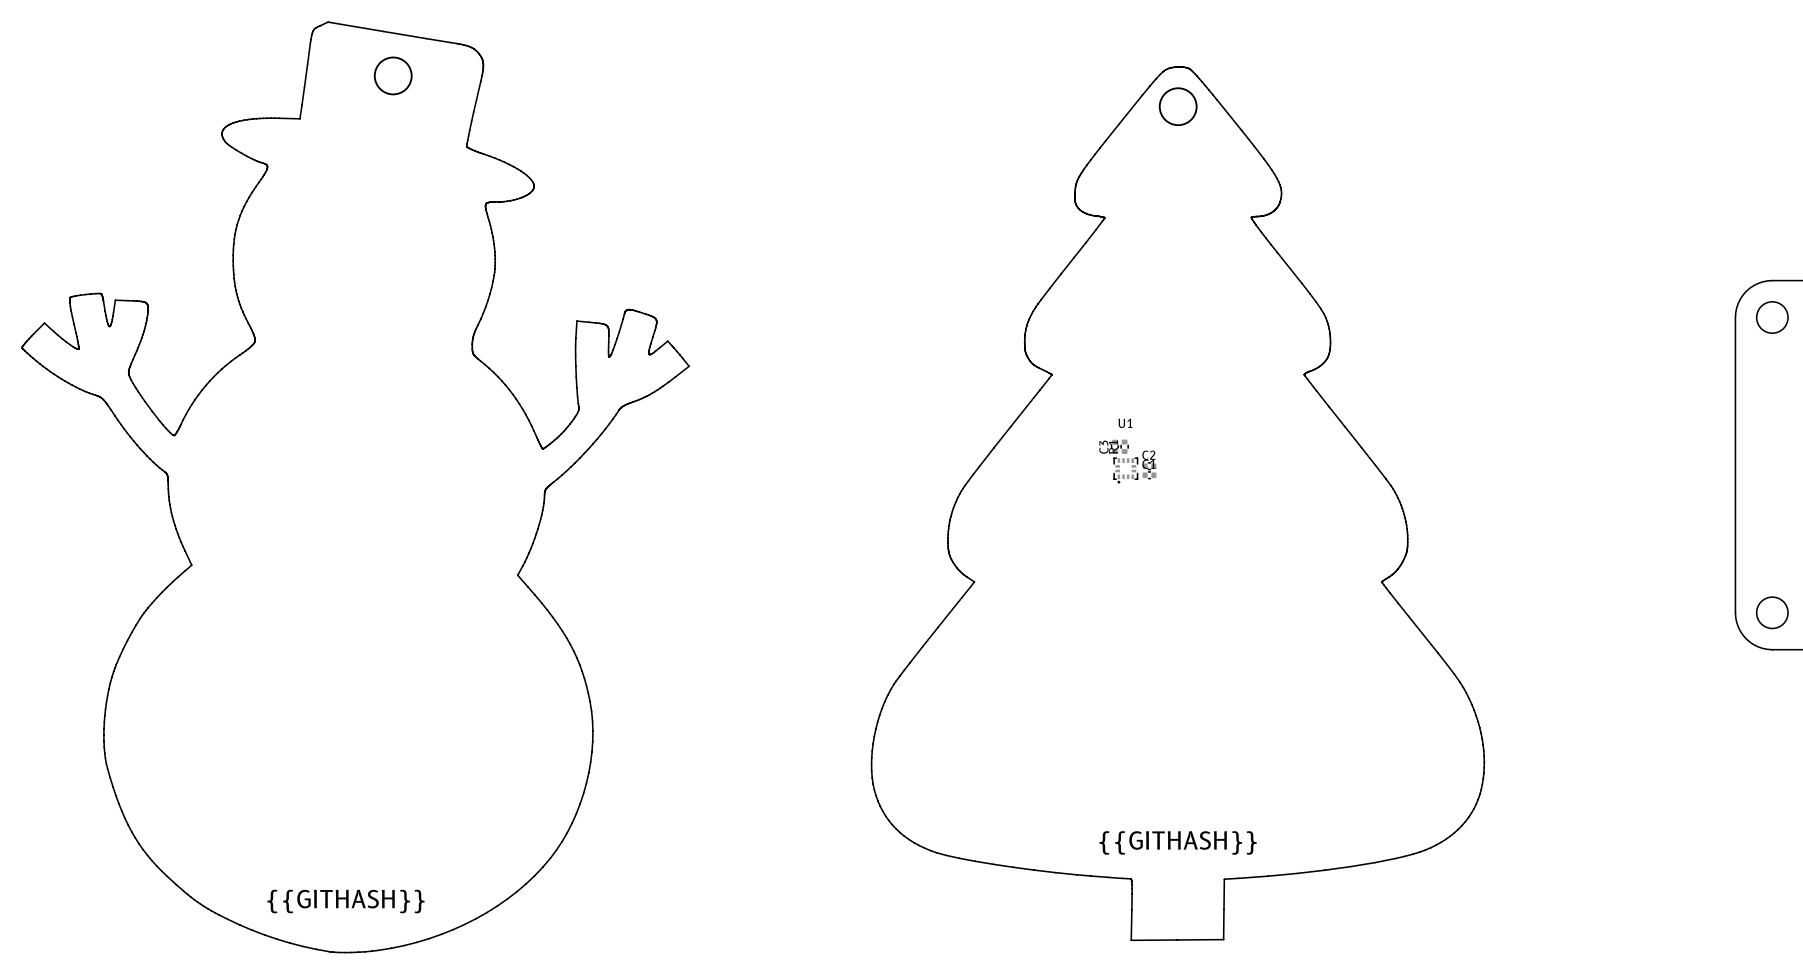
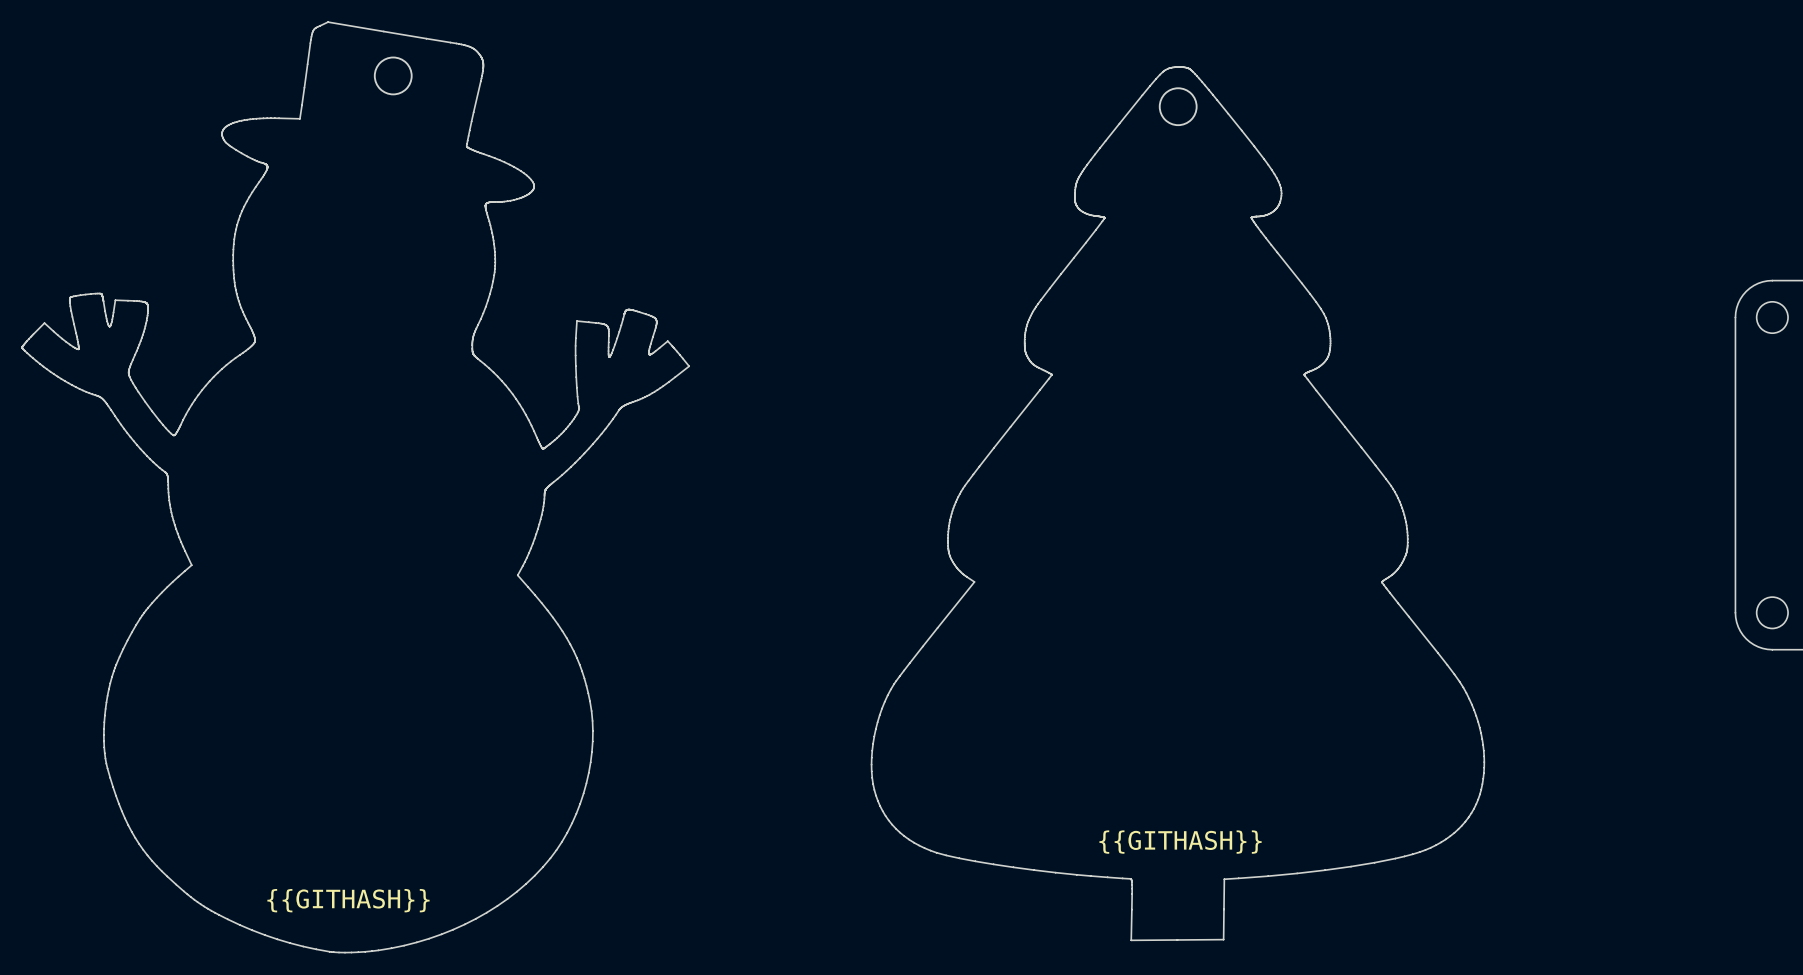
C3: (1114, 446) -> none
R1: (1124, 446) -> none
C2: (1149, 466) -> none
U1: (1125, 470) -> none
C1: (1149, 475) -> none

